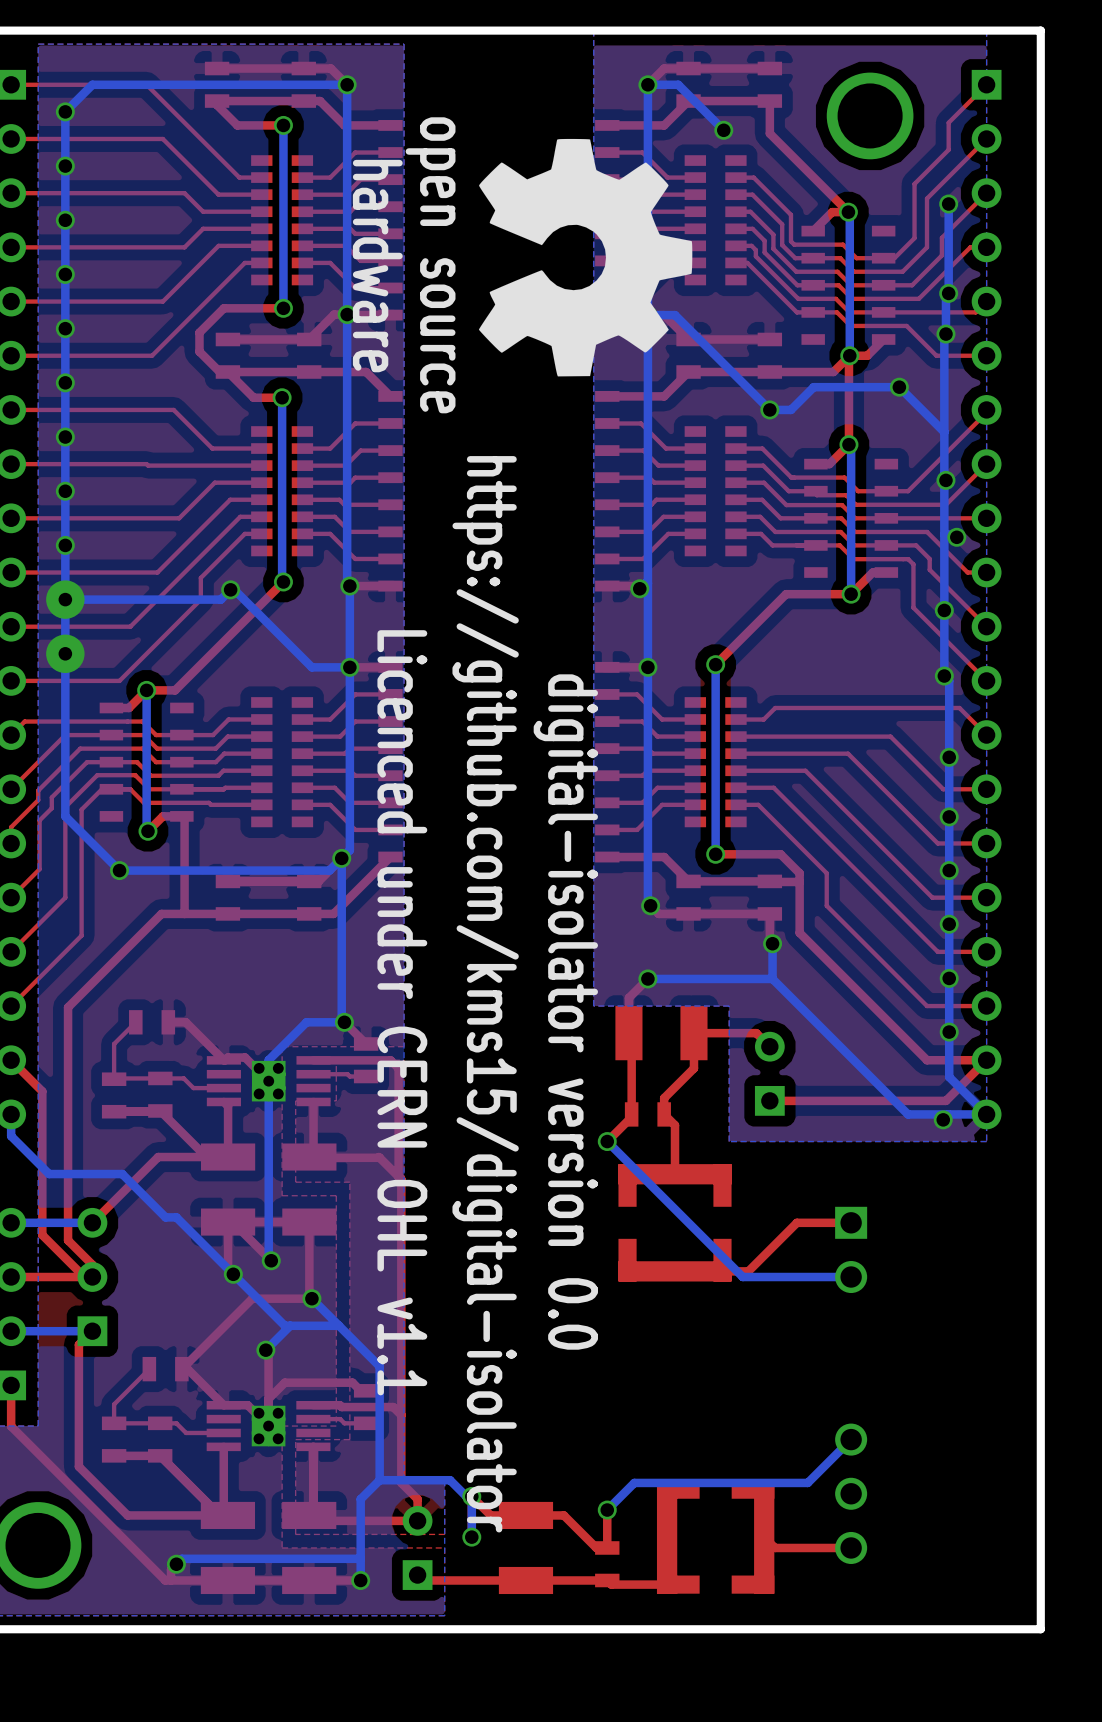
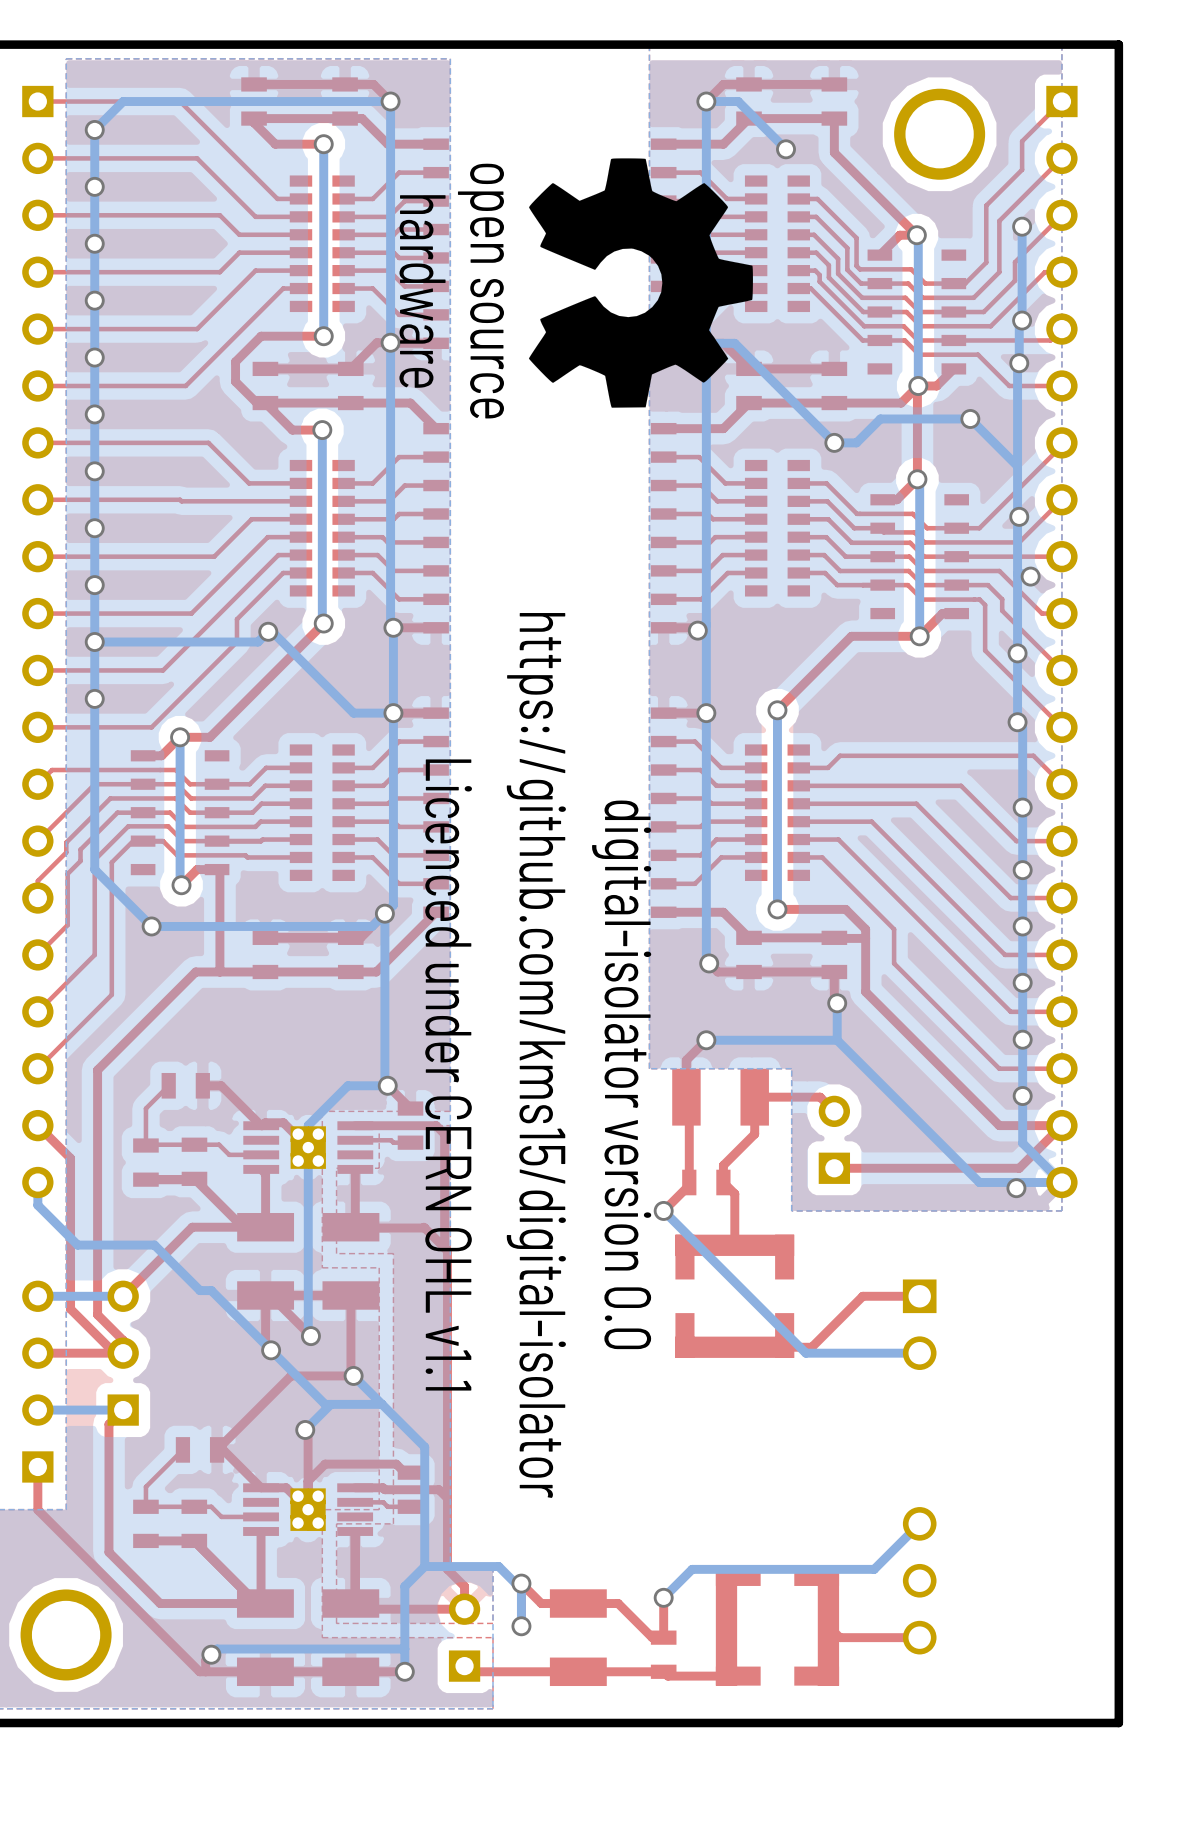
via size: [46, 580, 85, 619] -> [84, 632, 105, 652]
via size: [46, 634, 85, 674] -> [84, 688, 105, 709]

